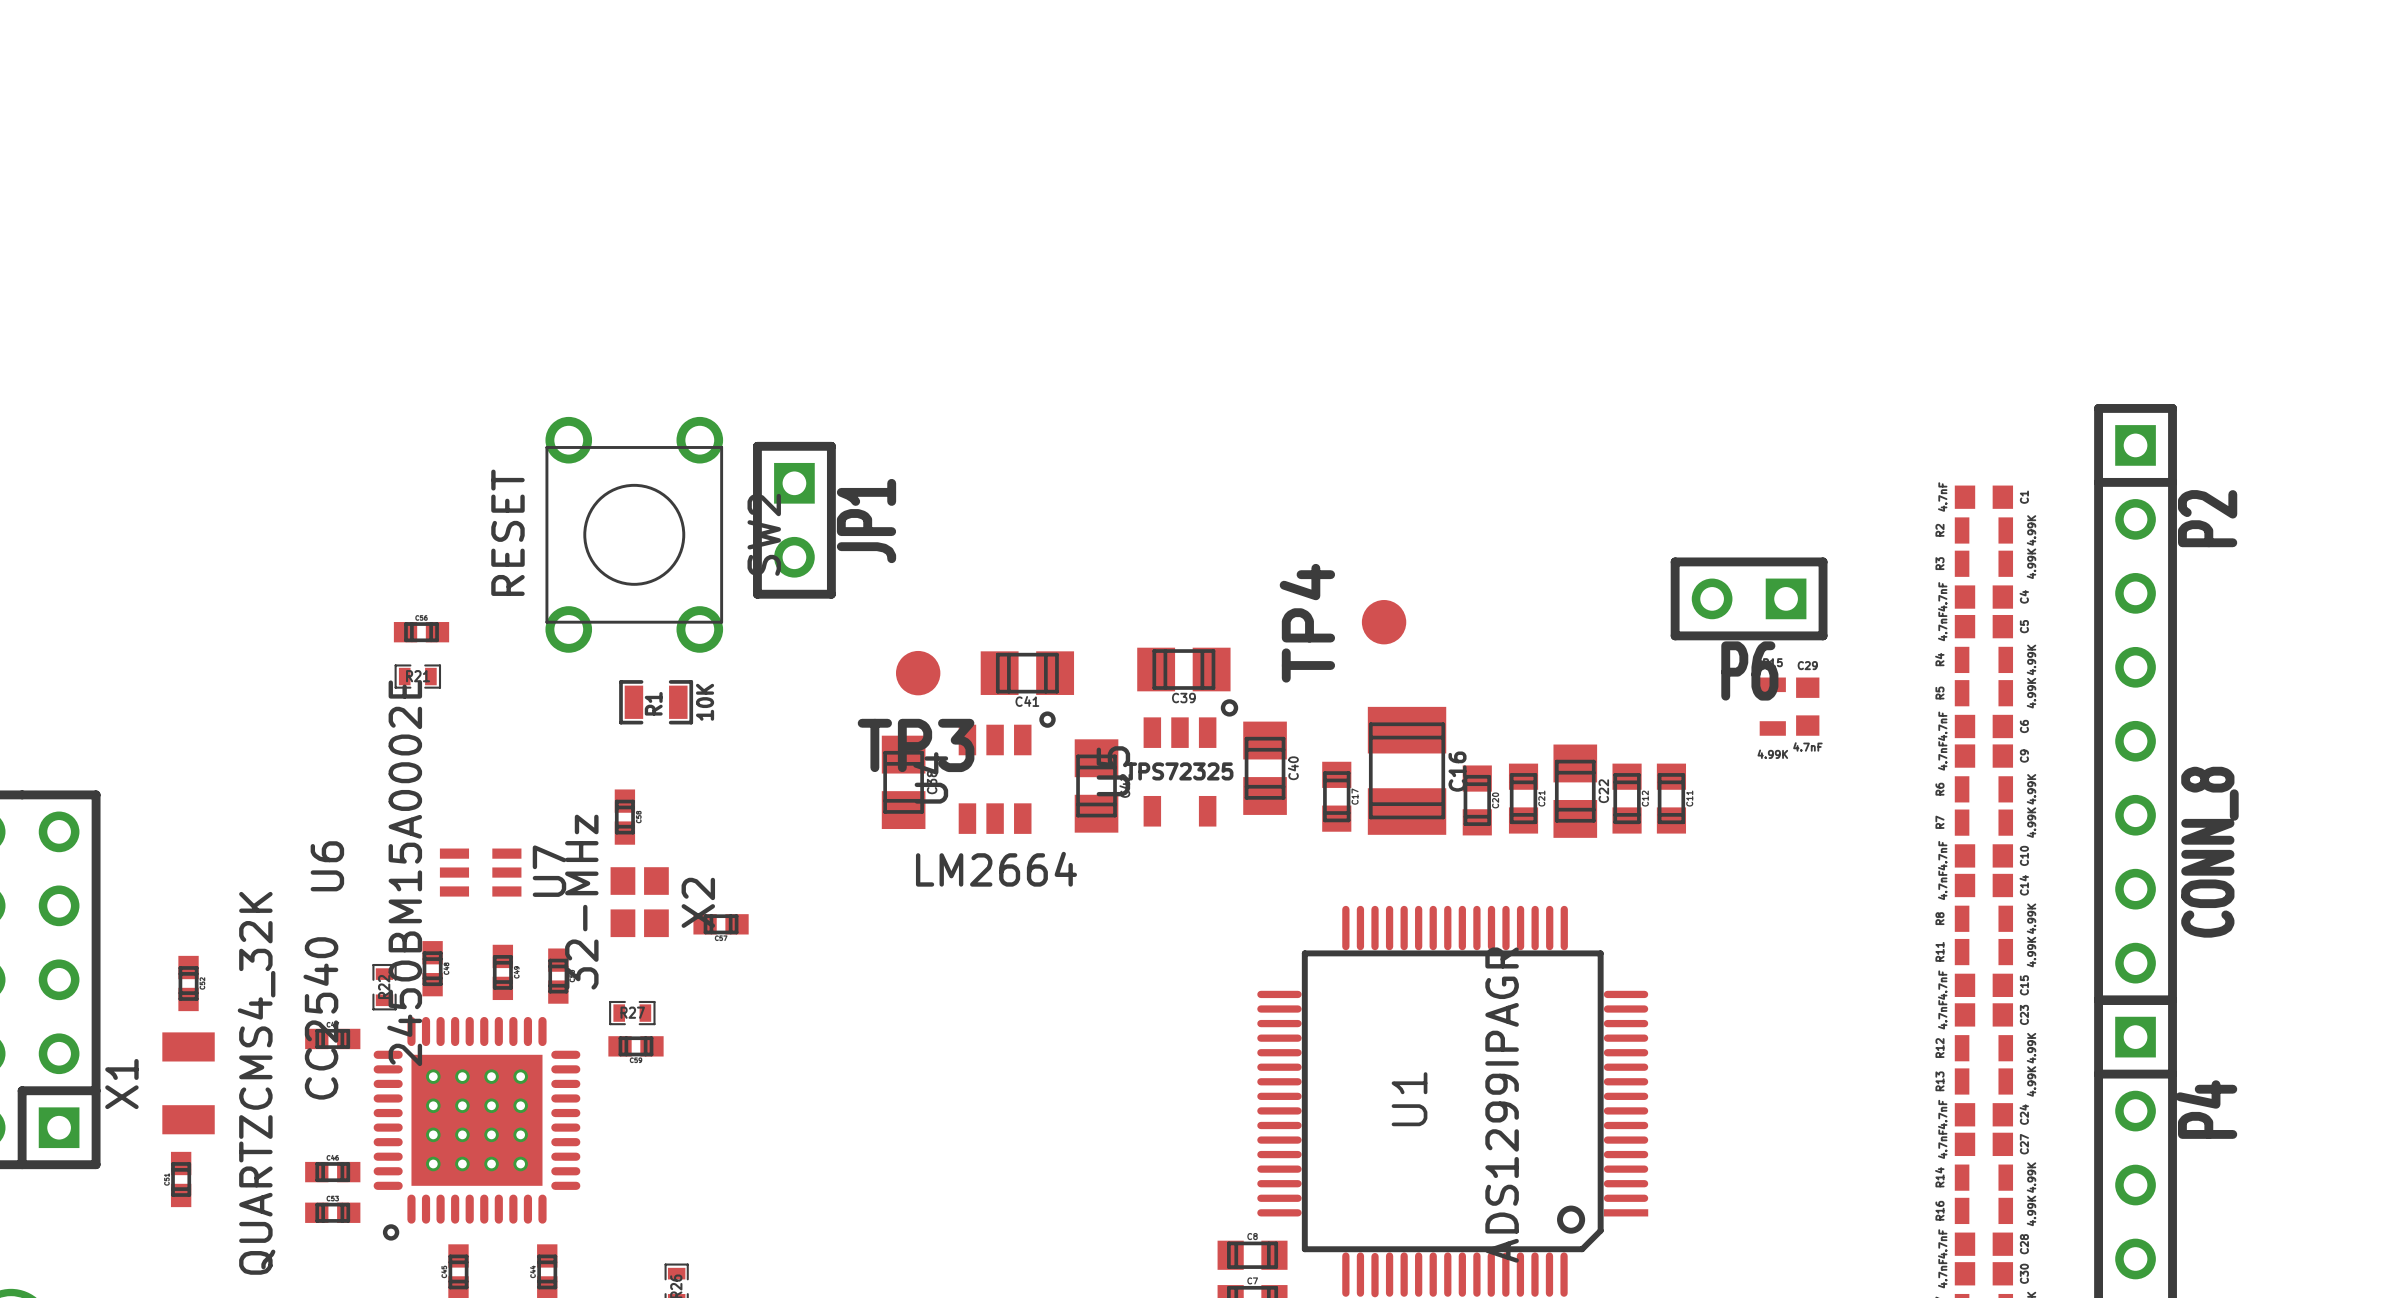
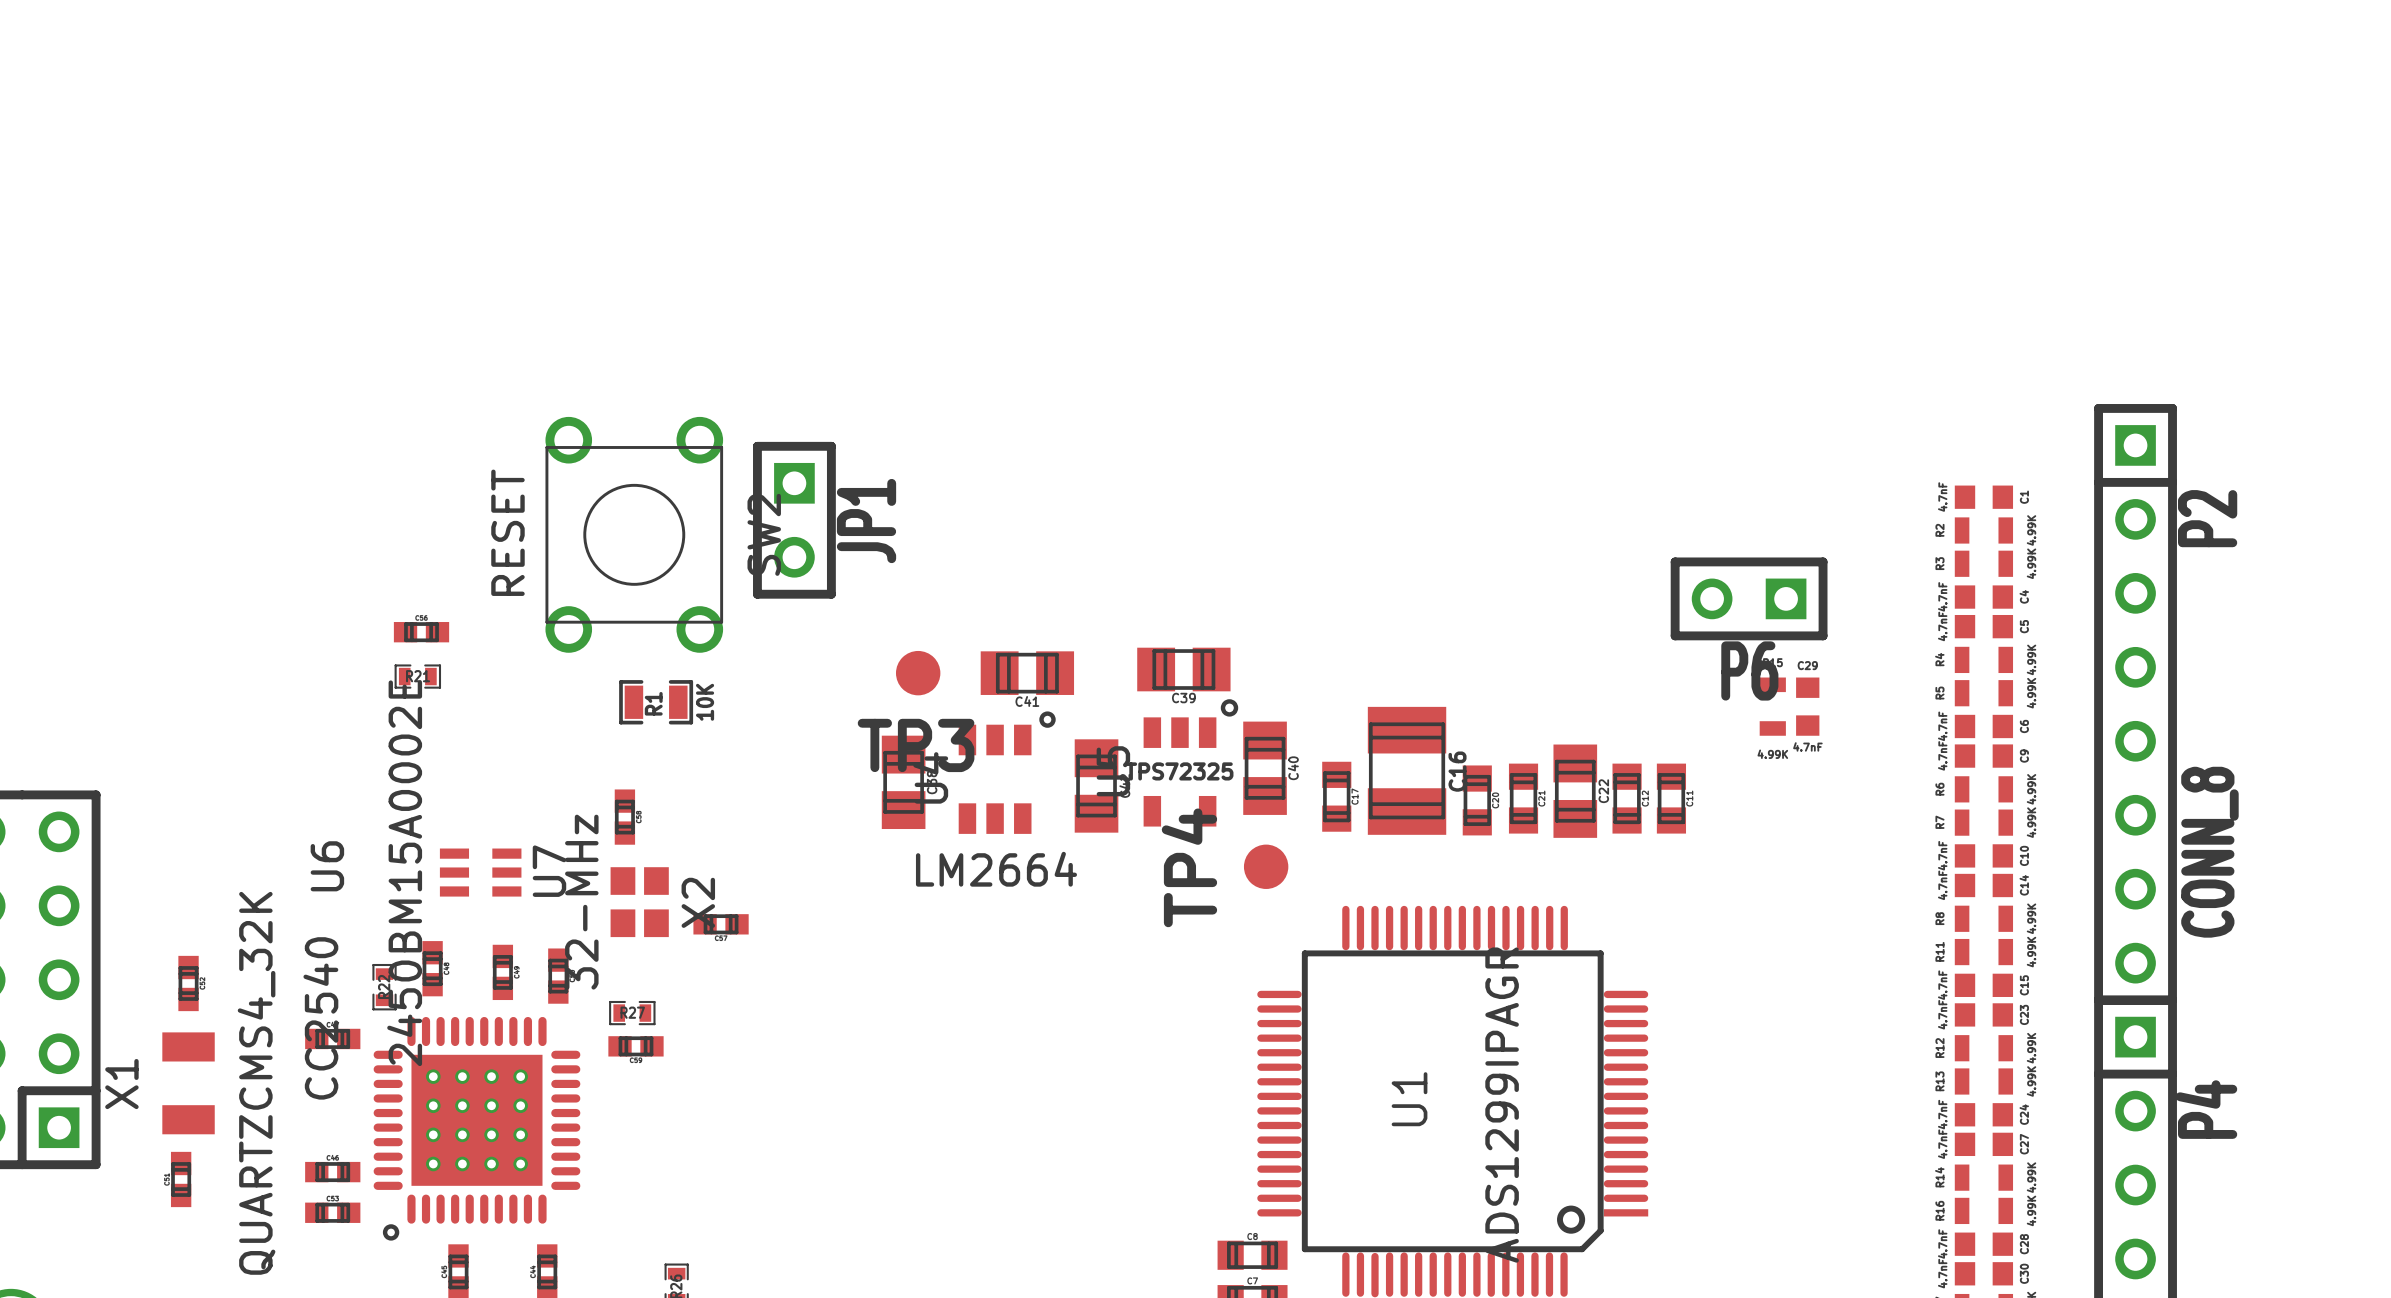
TP4 position: (1384, 622) -> (1266, 866)

